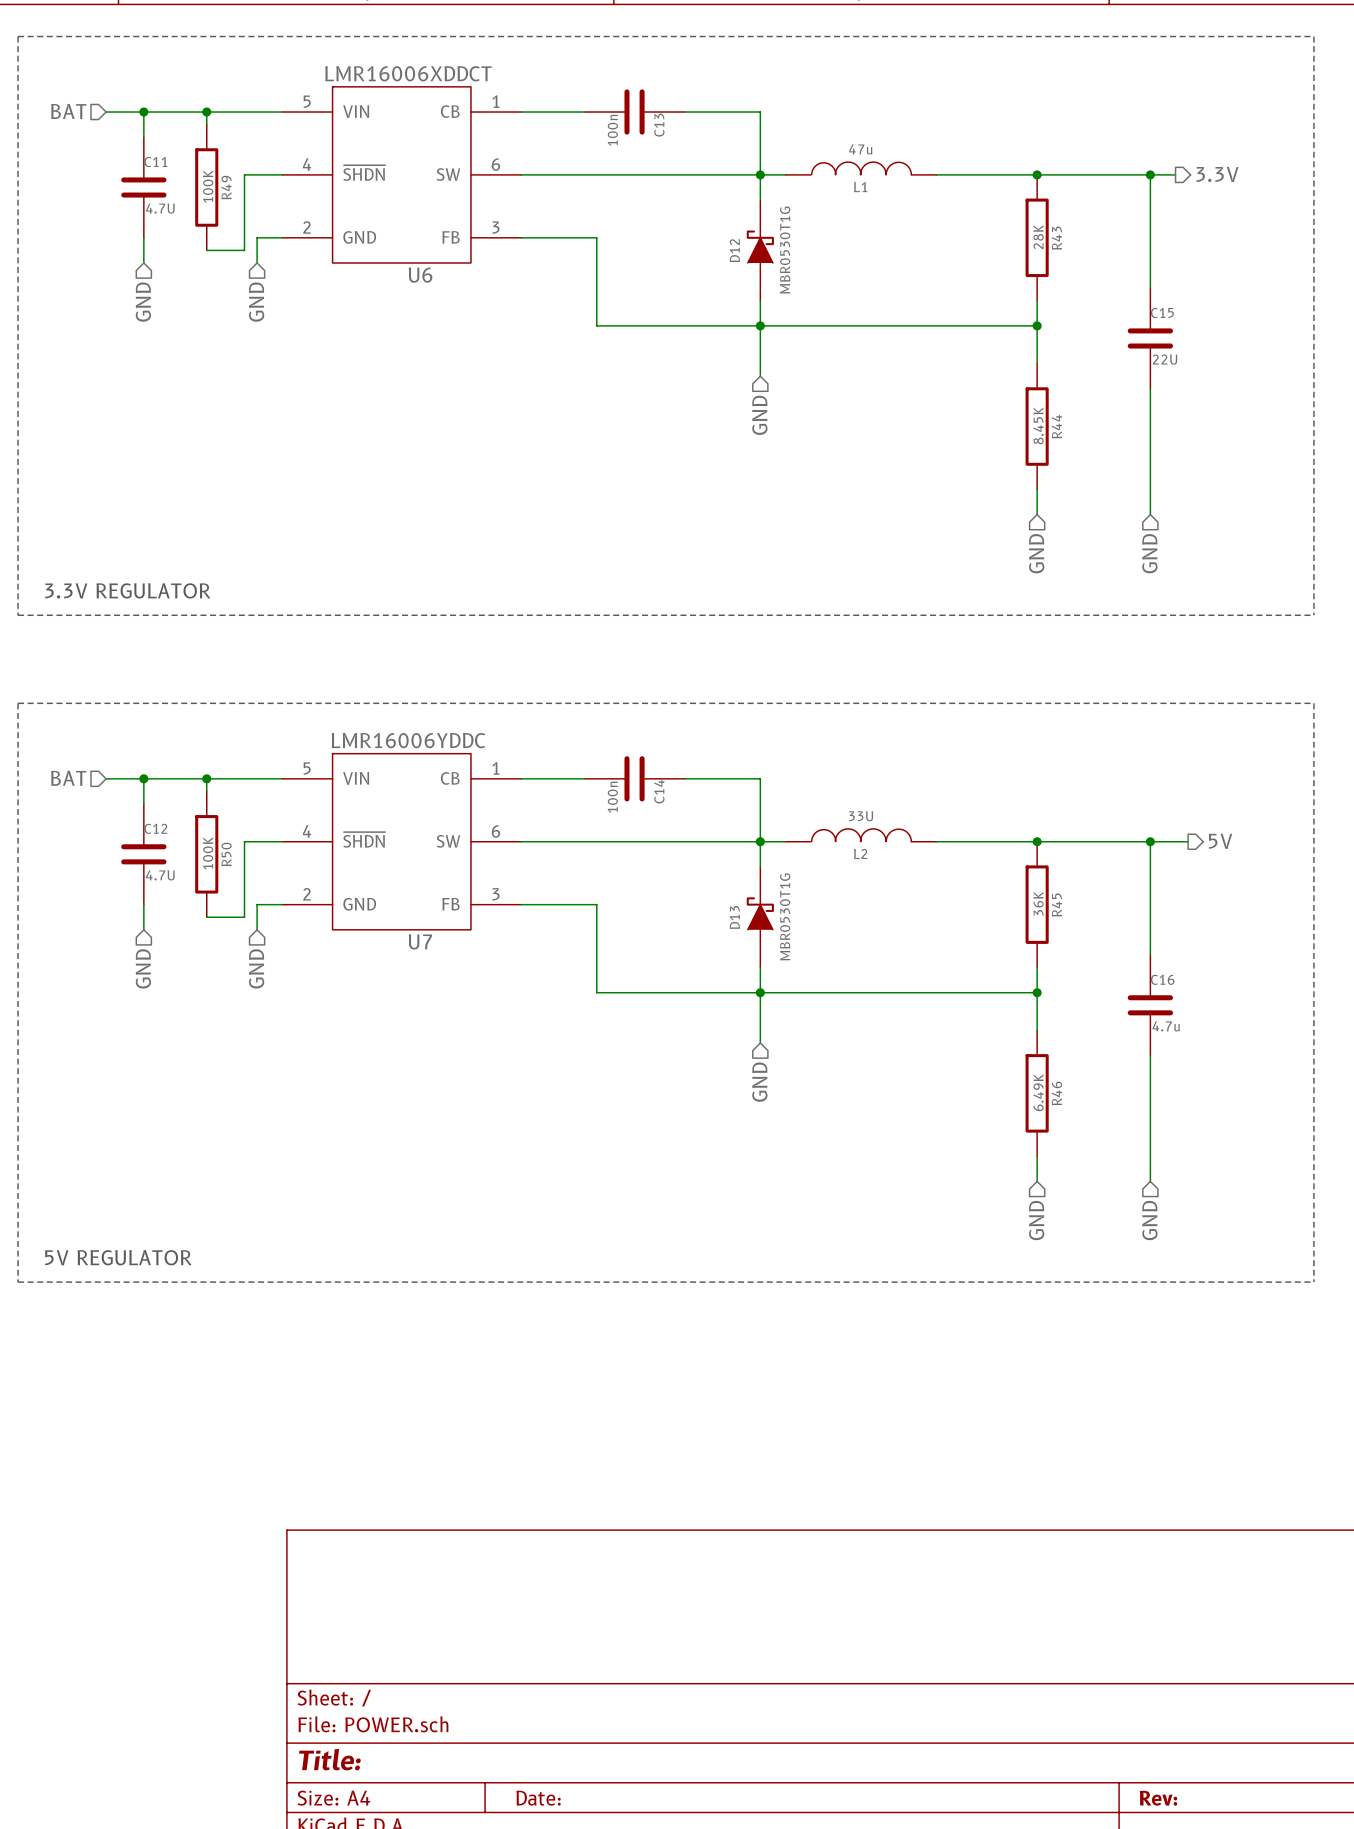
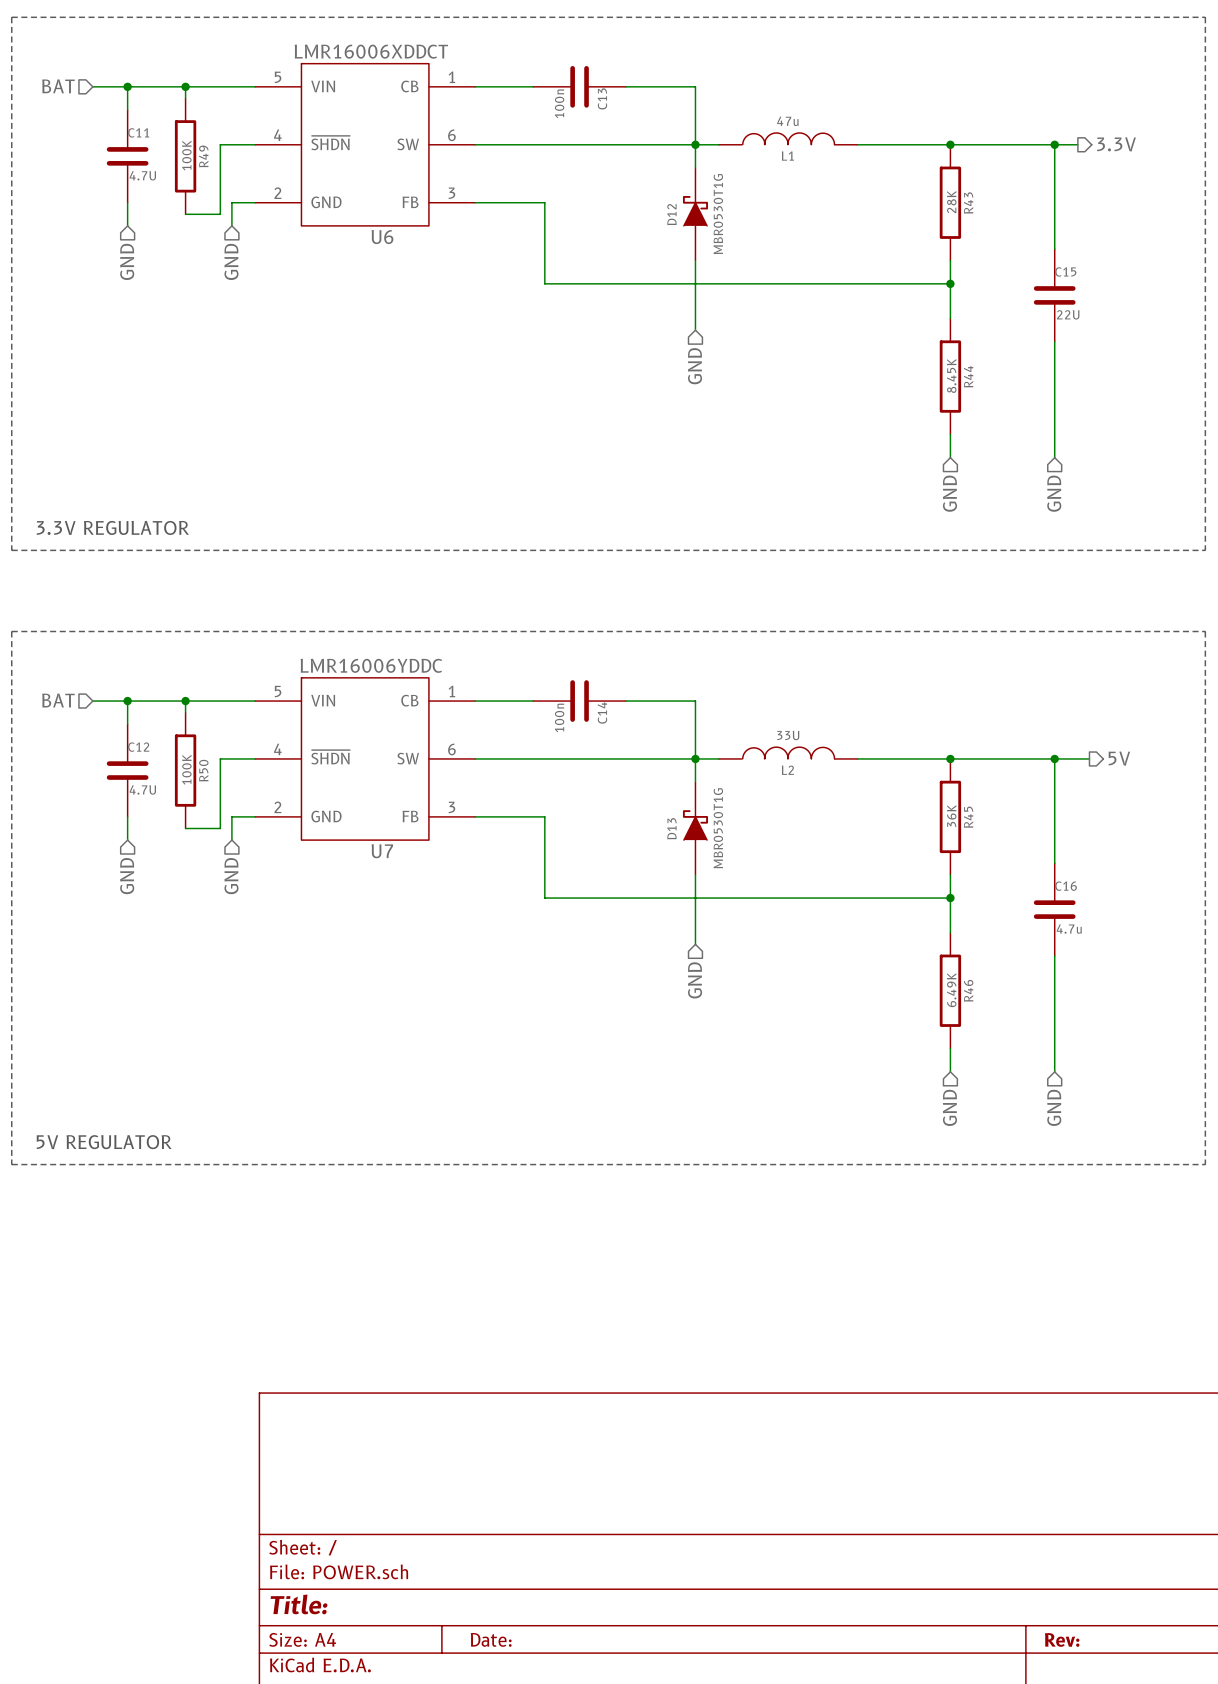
junction: (760, 325) -> none
junction: (760, 992) -> none

